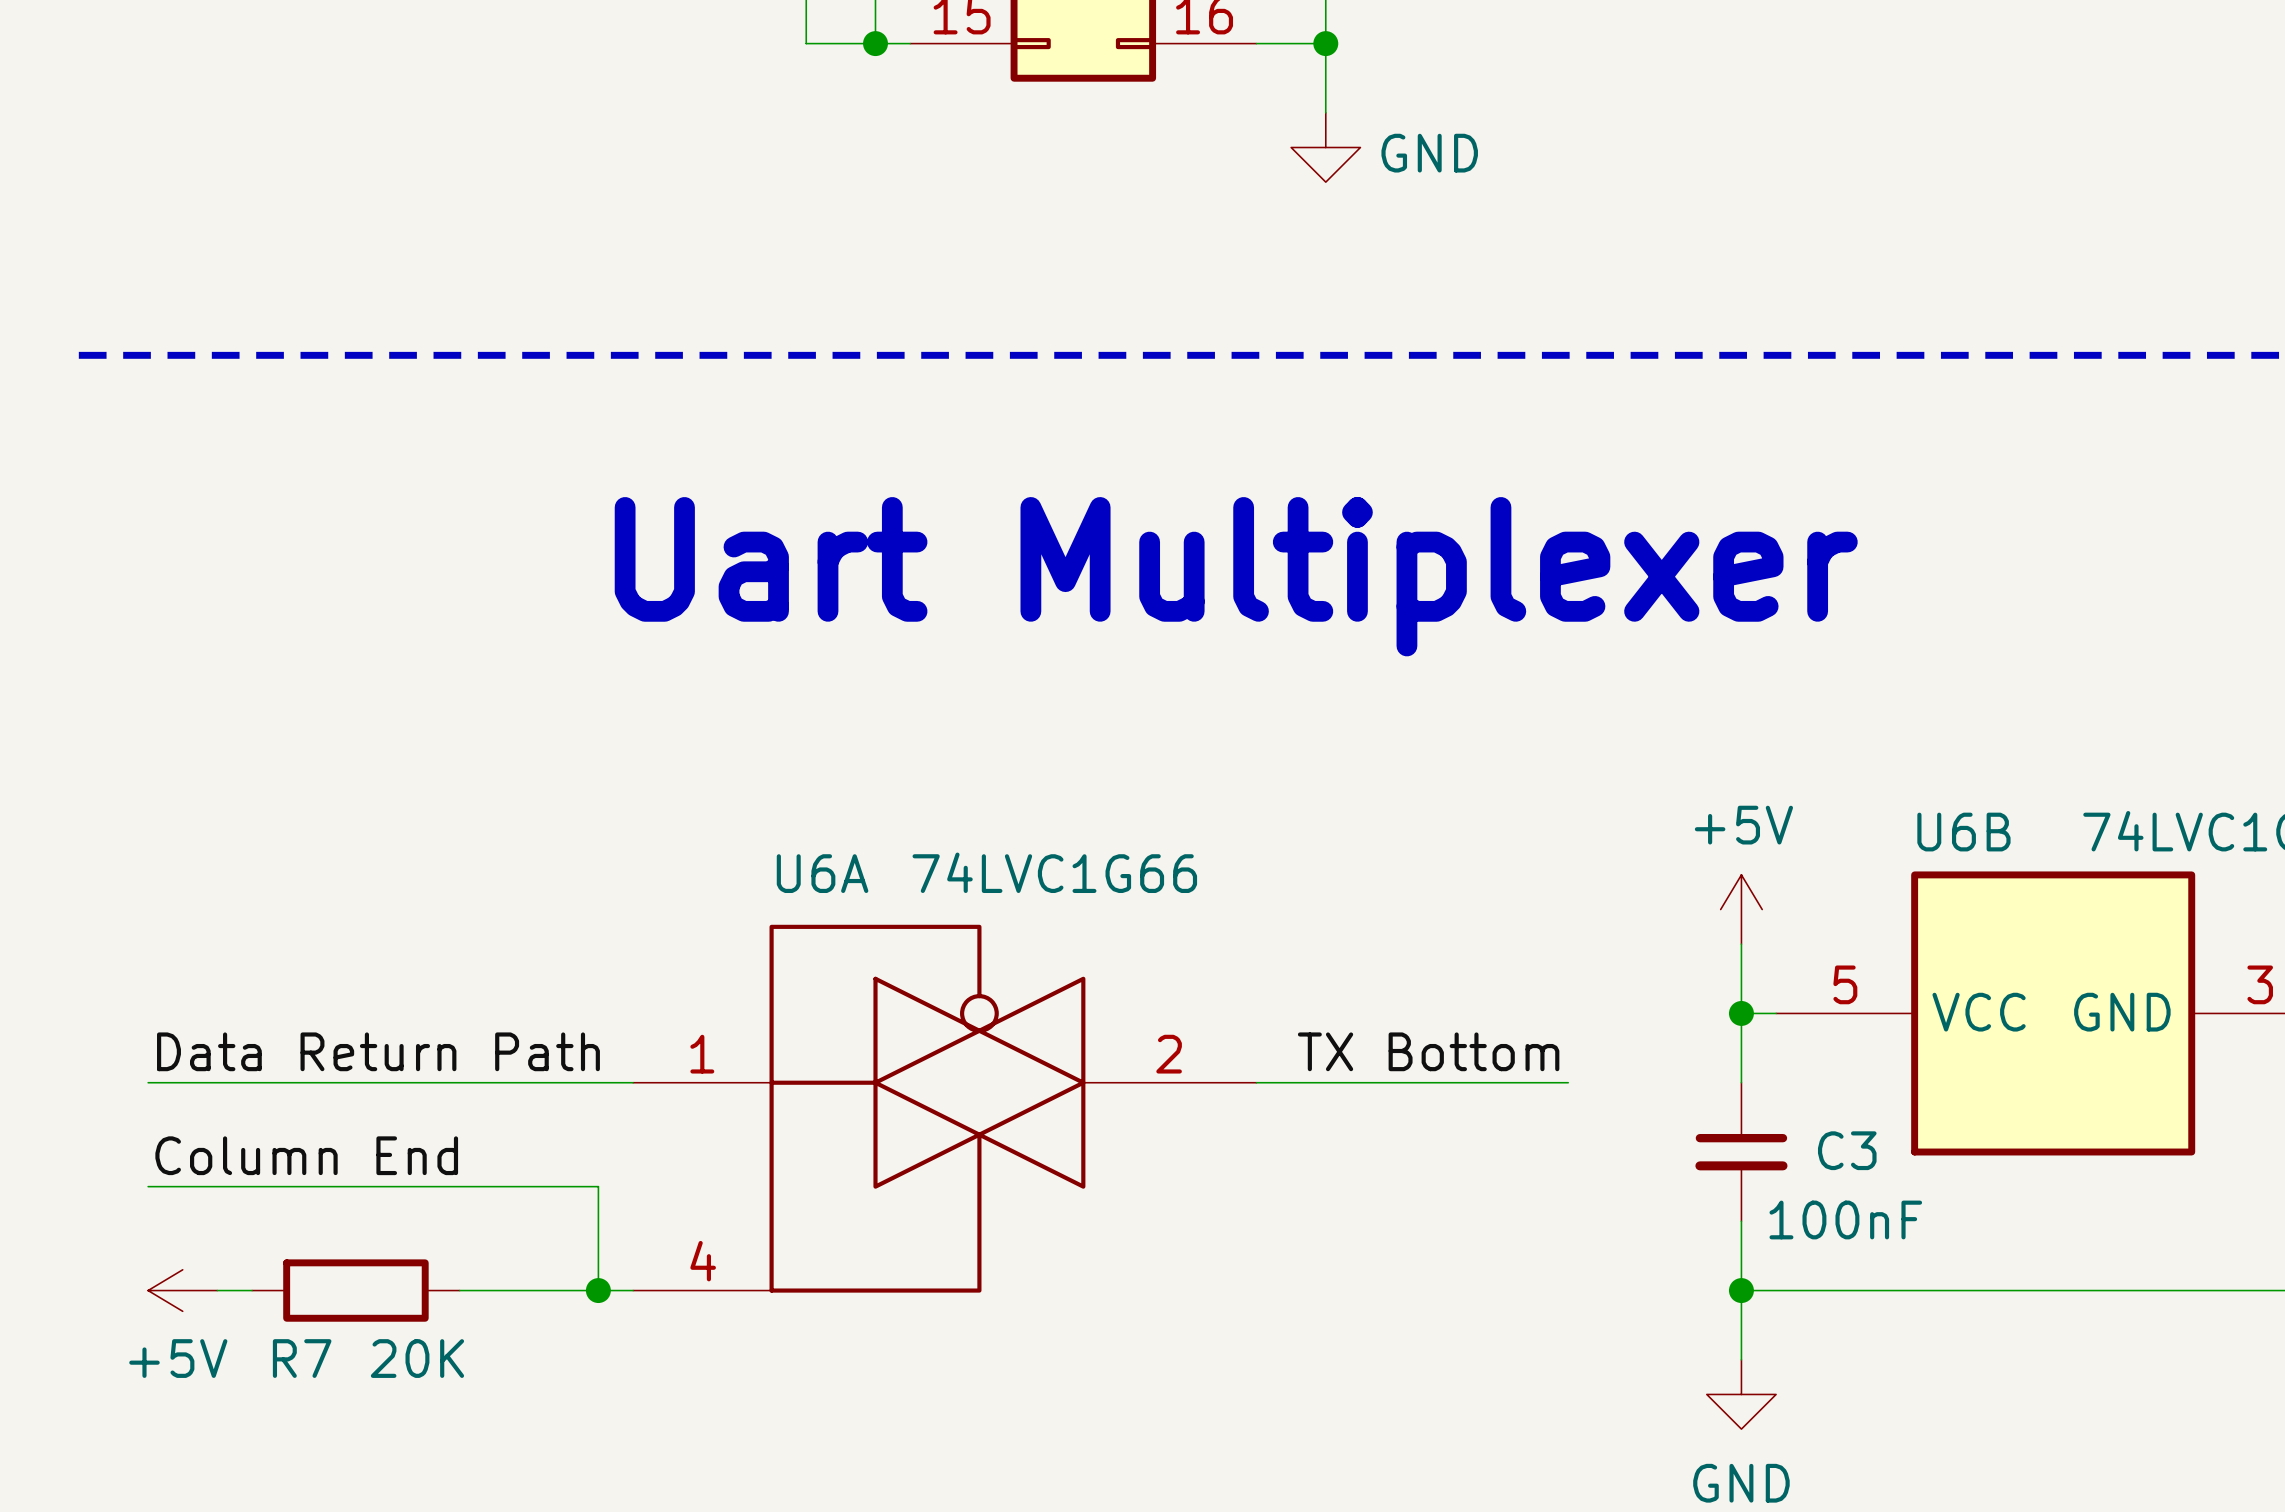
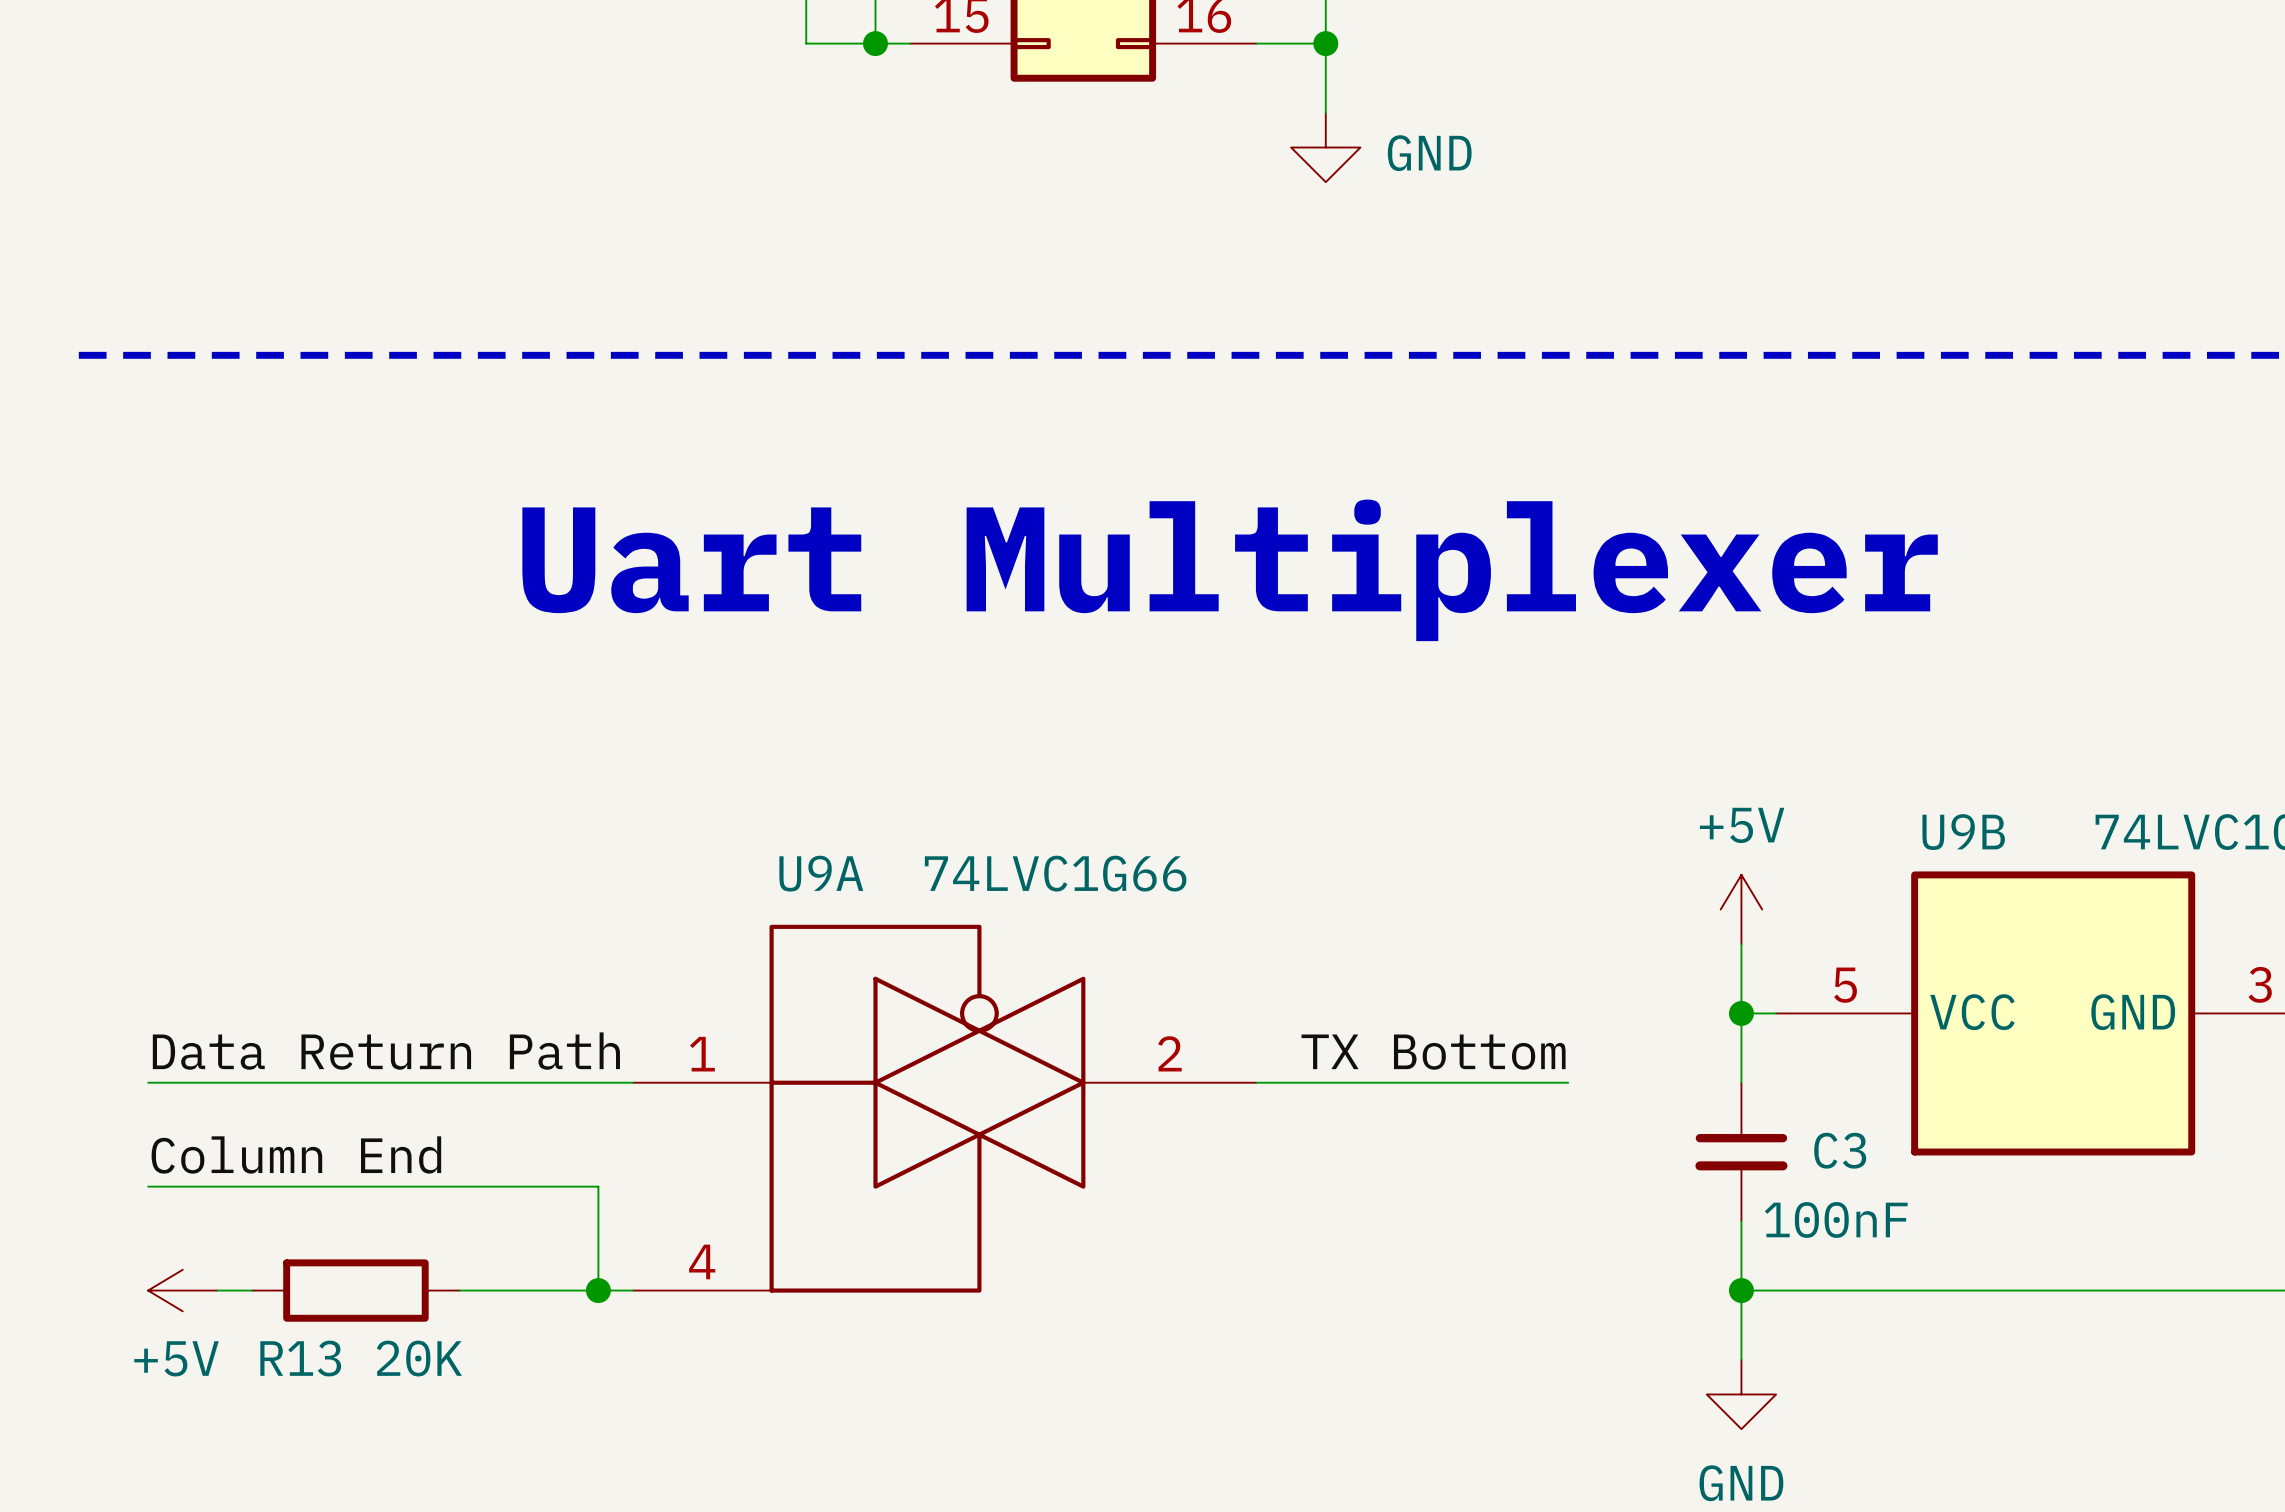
U6B name: U6B (1963, 832) -> U9B (1963, 832)
U6A name: U6A (822, 873) -> U9A (821, 873)
R7 name: R7 (302, 1358) -> R13 (300, 1358)

